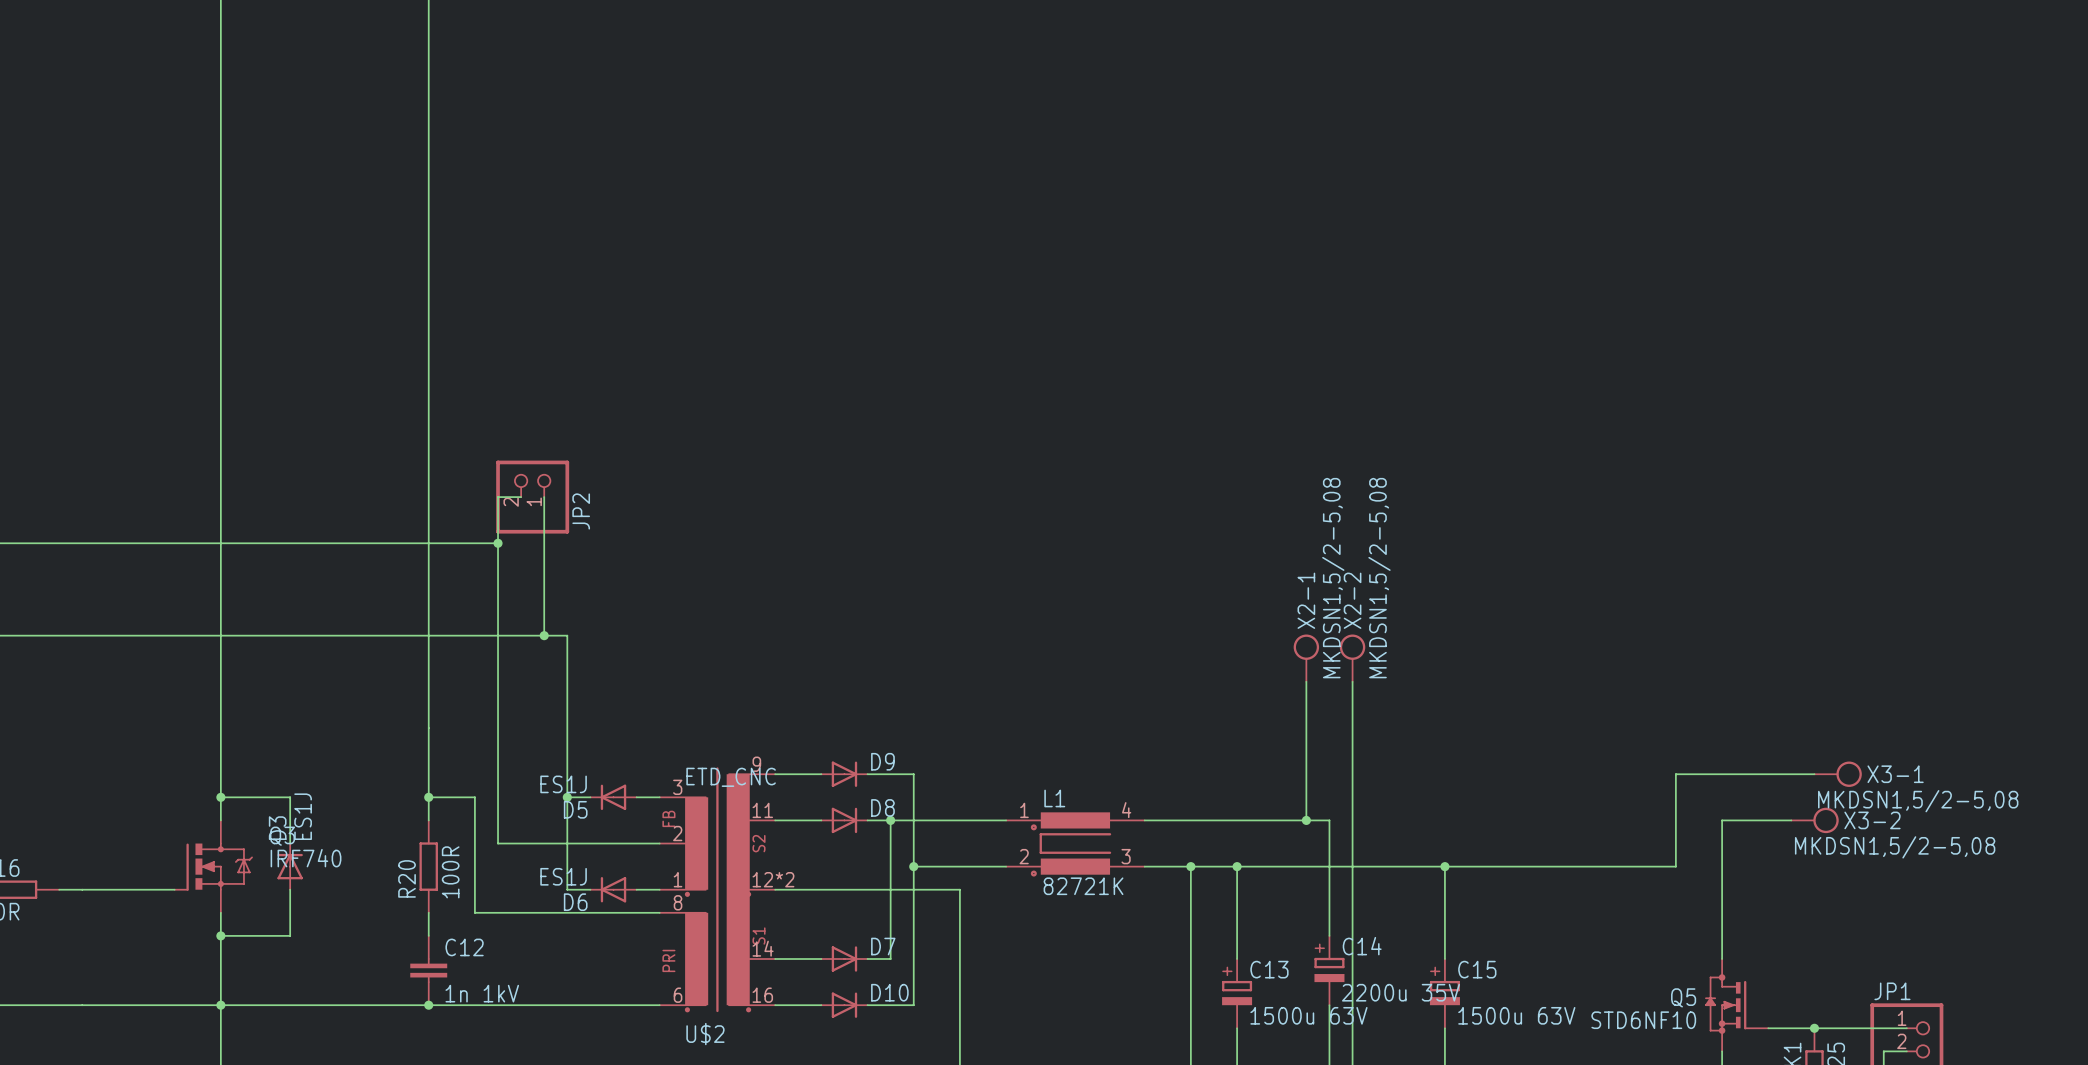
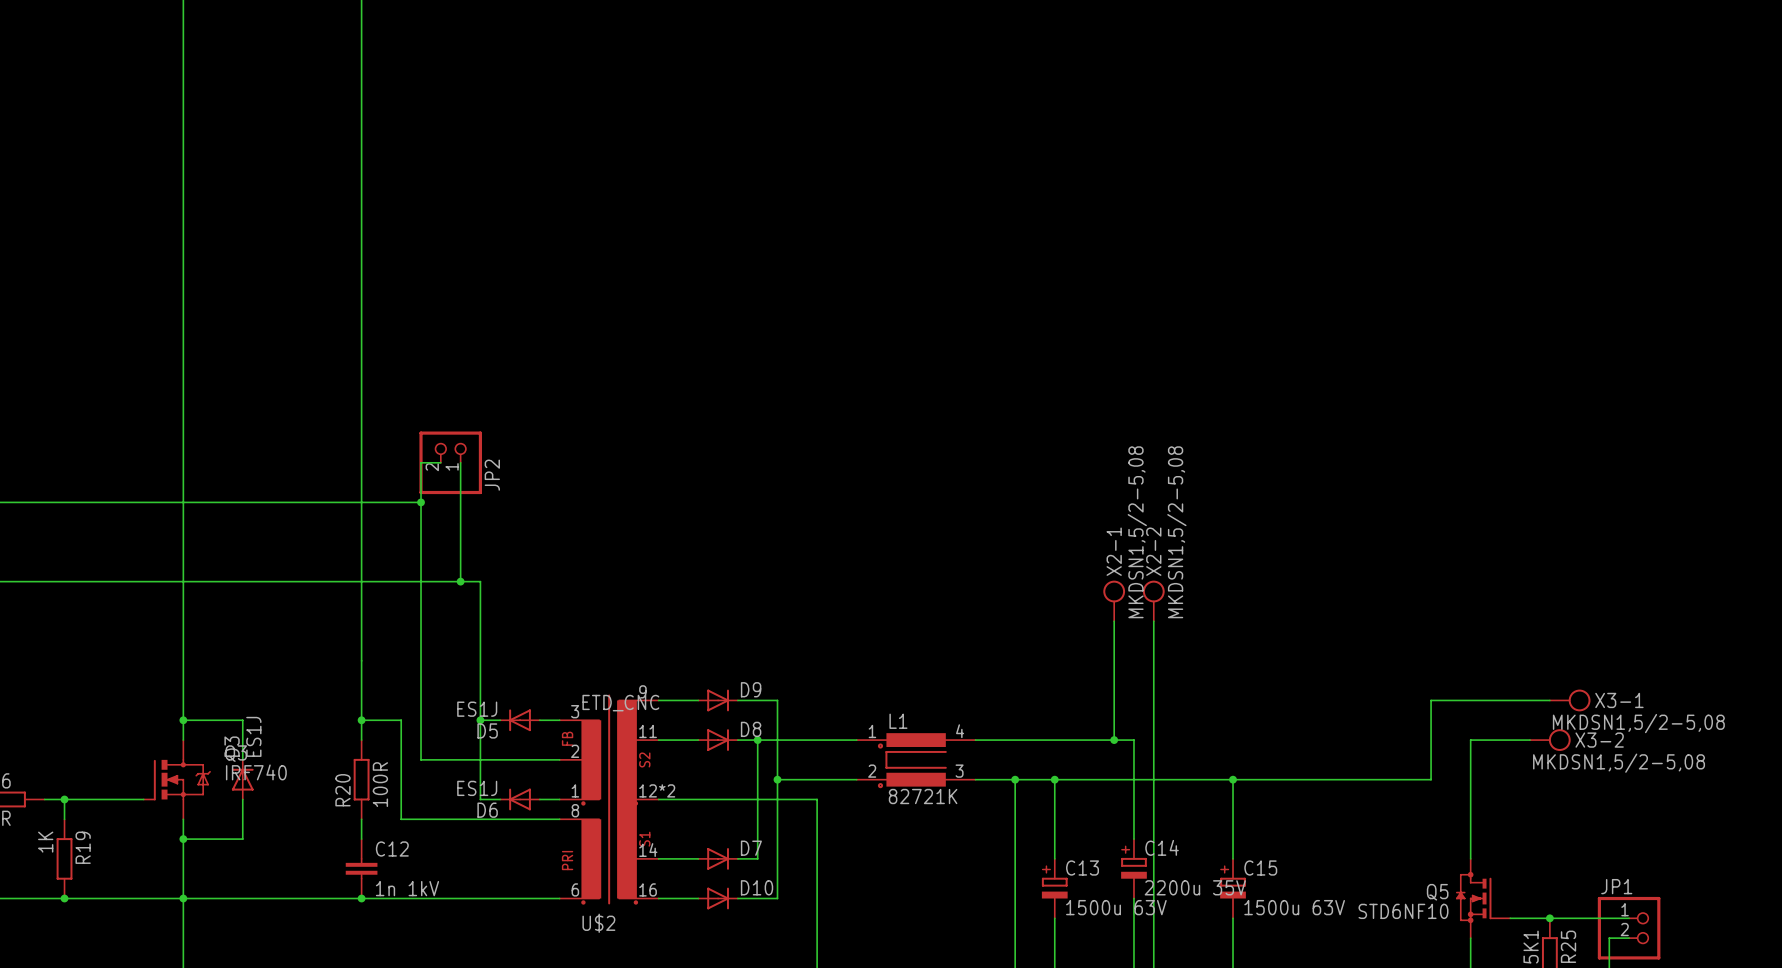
wire: none -> (64, 799) (64, 819)
junction: none -> (64, 799)
R19: none -> 1K (64, 858)
junction: none -> (64, 898)

